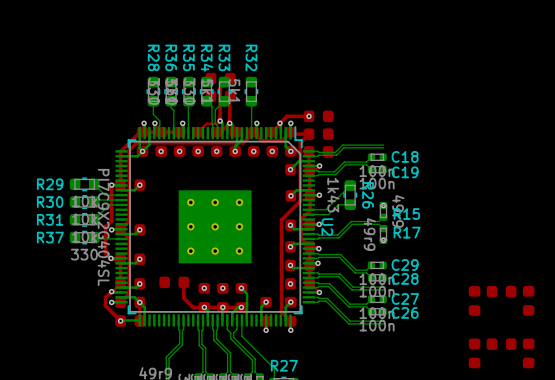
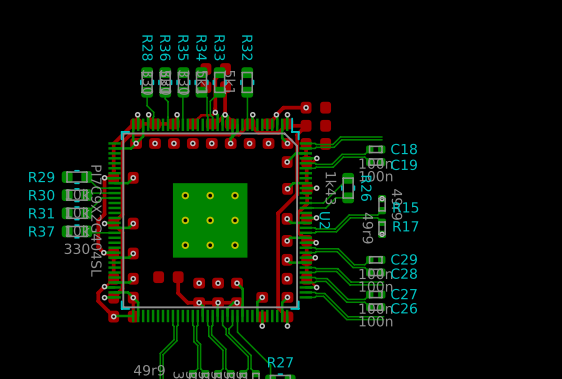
part: (501, 291) -> none
part: (474, 300) -> none
part: (528, 300) -> none
part: (501, 344) -> none
part: (474, 353) -> none
part: (528, 353) -> none

